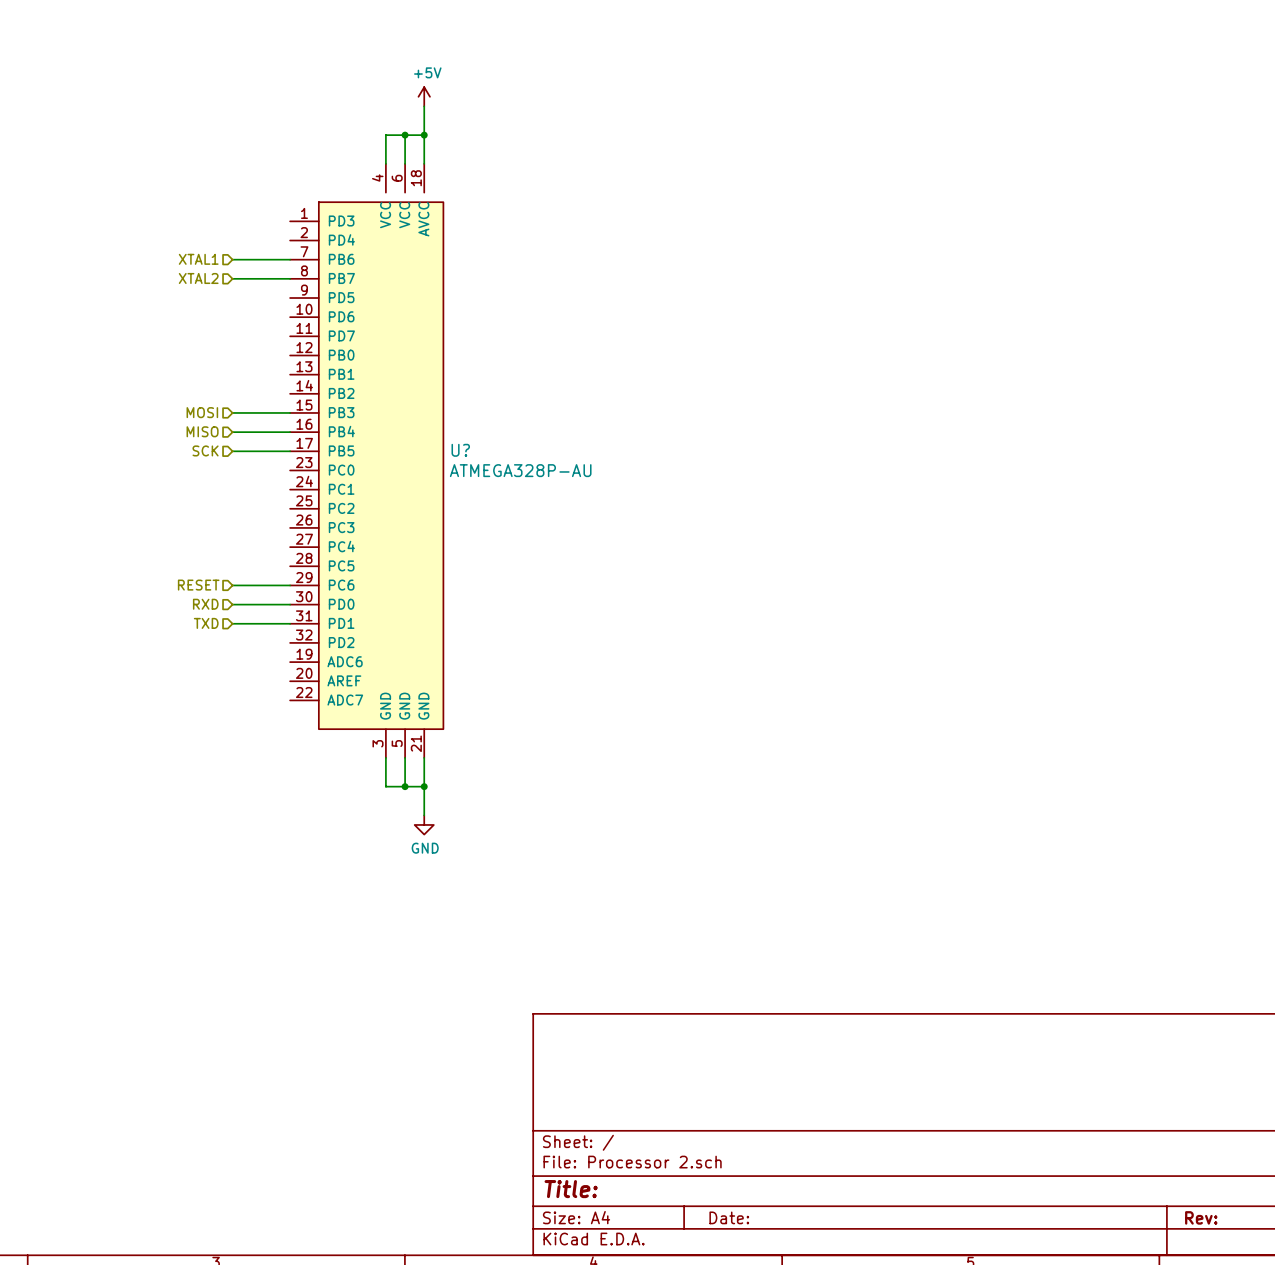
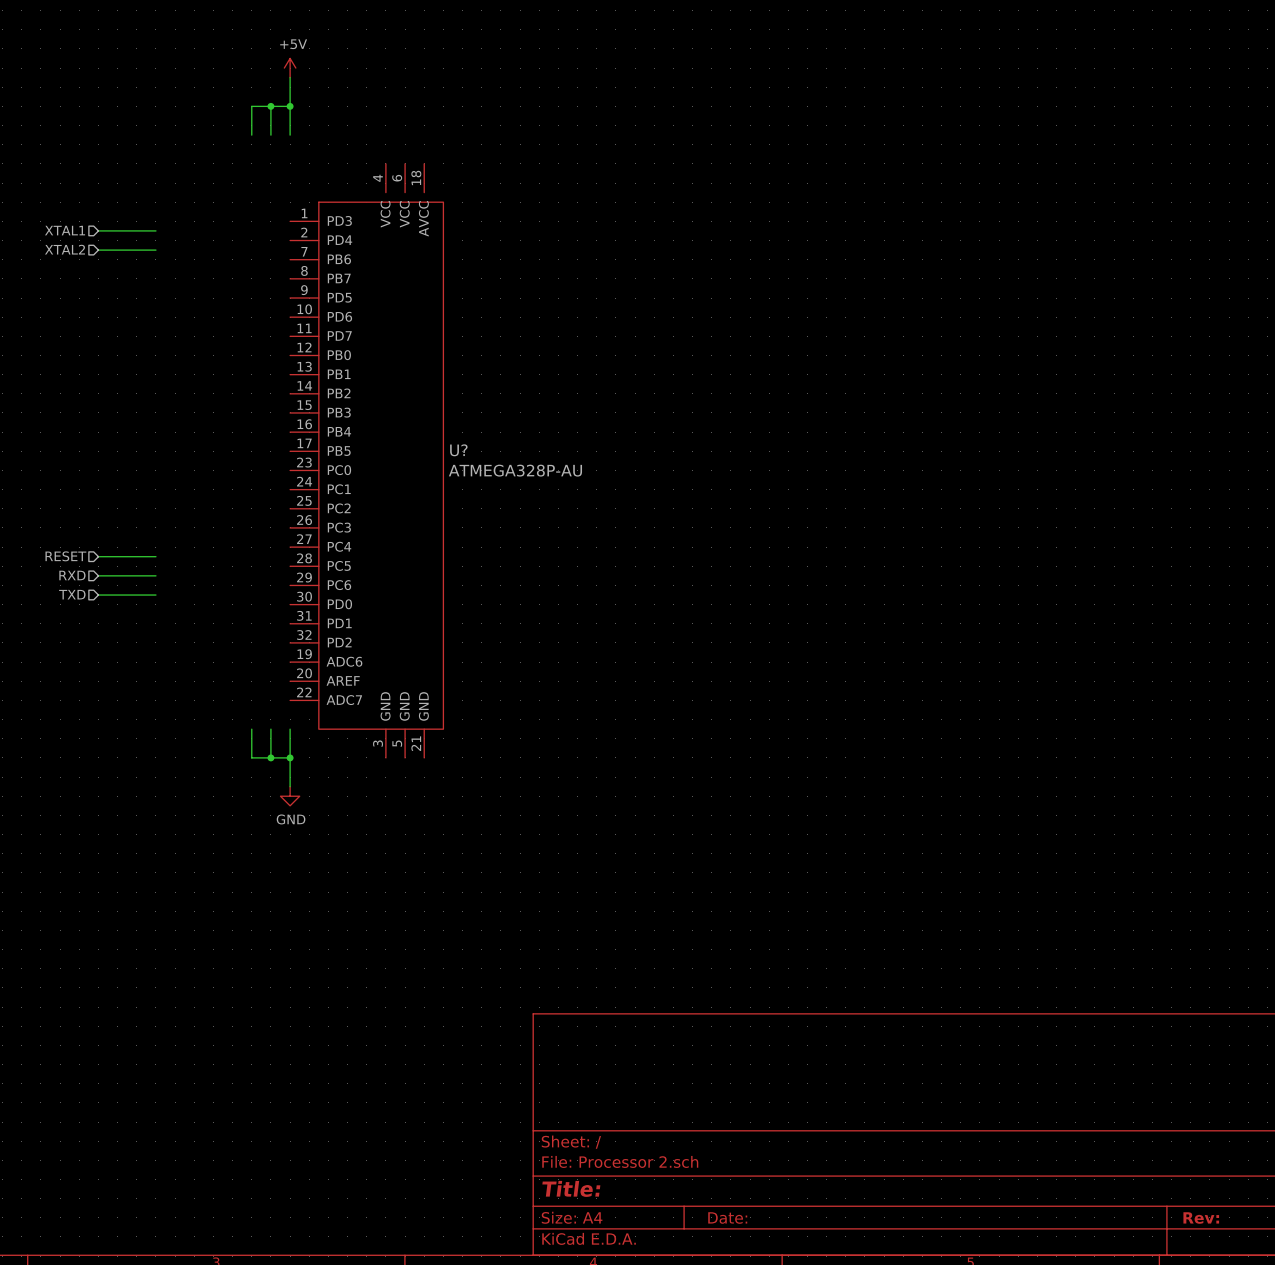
power symbol position: +5V (424, 96) -> +5V (290, 68)
junction: none -> (270, 106)
junction: none -> (290, 106)
wire: (424, 106) (424, 163) -> (290, 77) (290, 135)
wire: (405, 135) (405, 163) -> (270, 106) (270, 135)
junction: (405, 135) -> none
wire: (424, 135) (385, 135) (385, 163) -> (290, 106) (251, 106) (251, 135)
junction: (424, 135) -> none
hierarchical label position: XTAL1 (198, 259) -> XTAL1 (65, 230)
wire: (232, 259) (290, 259) -> (98, 230) (155, 230)
hierarchical label position: XTAL2 (198, 278) -> XTAL2 (64, 249)
wire: (232, 278) (290, 278) -> (98, 250) (155, 250)
hierarchical label: MOSI (202, 412) -> none
wire: (232, 412) (290, 412) -> none
hierarchical label: MISO (202, 431) -> none
wire: (232, 432) (290, 432) -> none
hierarchical label: SCK (205, 450) -> none
wire: (232, 451) (290, 451) -> none
hierarchical label position: RESET (198, 585) -> RESET (65, 556)
wire: (232, 585) (290, 585) -> (98, 556) (155, 556)
hierarchical label position: RXD (205, 604) -> RXD (72, 575)
wire: (232, 604) (290, 604) -> (98, 575) (155, 575)
hierarchical label position: TXD (206, 623) -> TXD (72, 594)
wire: (232, 623) (290, 623) -> (98, 595) (155, 595)
junction: none -> (270, 757)
junction: none -> (290, 757)
wire: (385, 757) (385, 786) (424, 786) -> (251, 729) (251, 757) (290, 757)
wire: (405, 757) (405, 786) -> (270, 729) (270, 757)
wire: (424, 757) (424, 815) -> (290, 729) (290, 786)
junction: (405, 786) -> none
junction: (424, 786) -> none
power symbol position: GND (424, 824) -> GND (290, 796)

